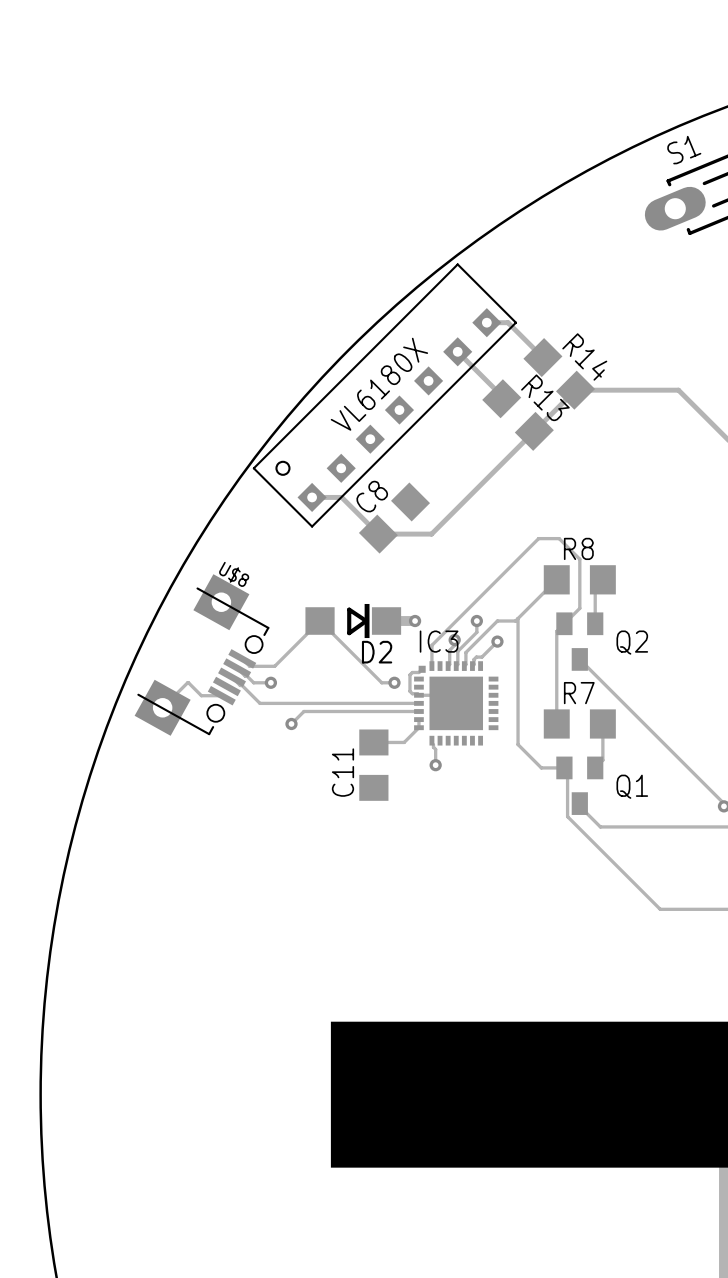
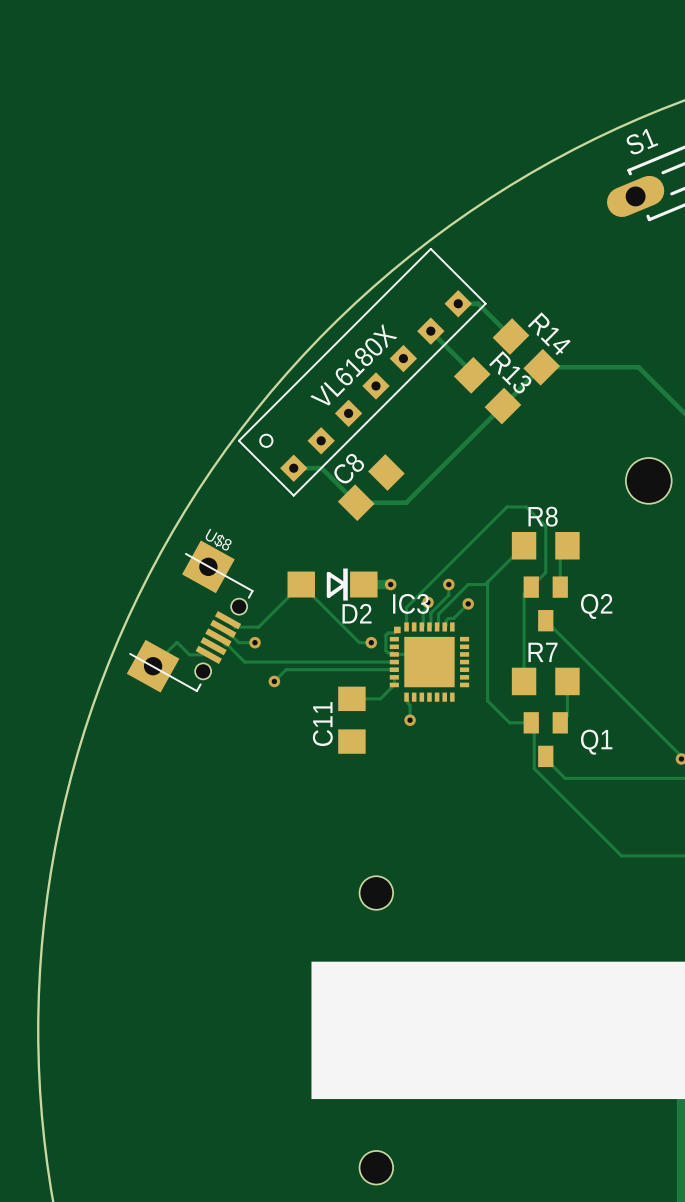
hole: none -> (648, 480)
hole: none -> (376, 893)
hole: none -> (376, 1167)

